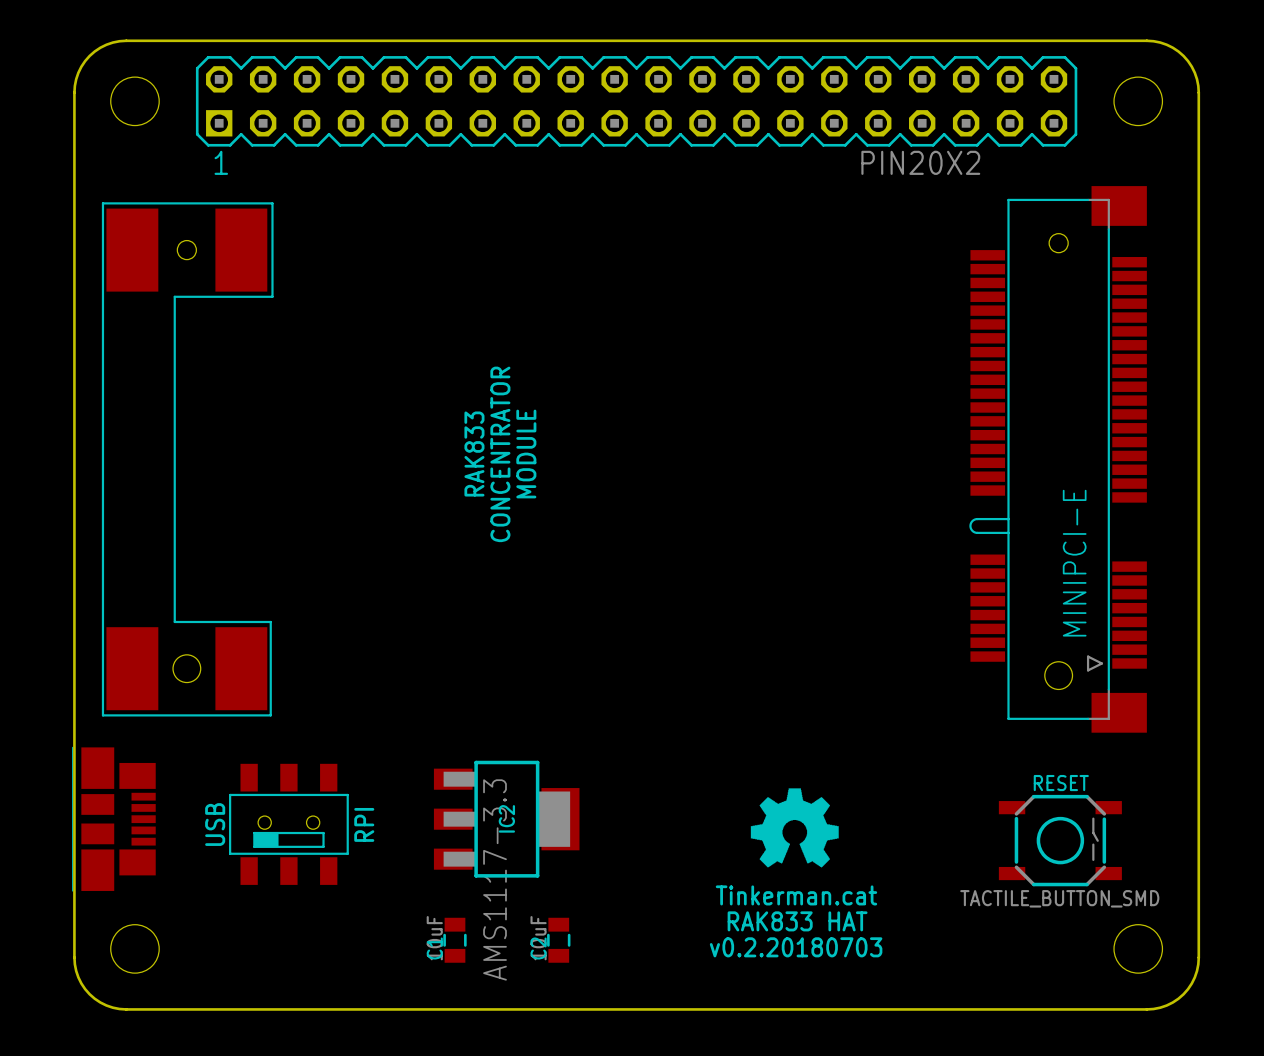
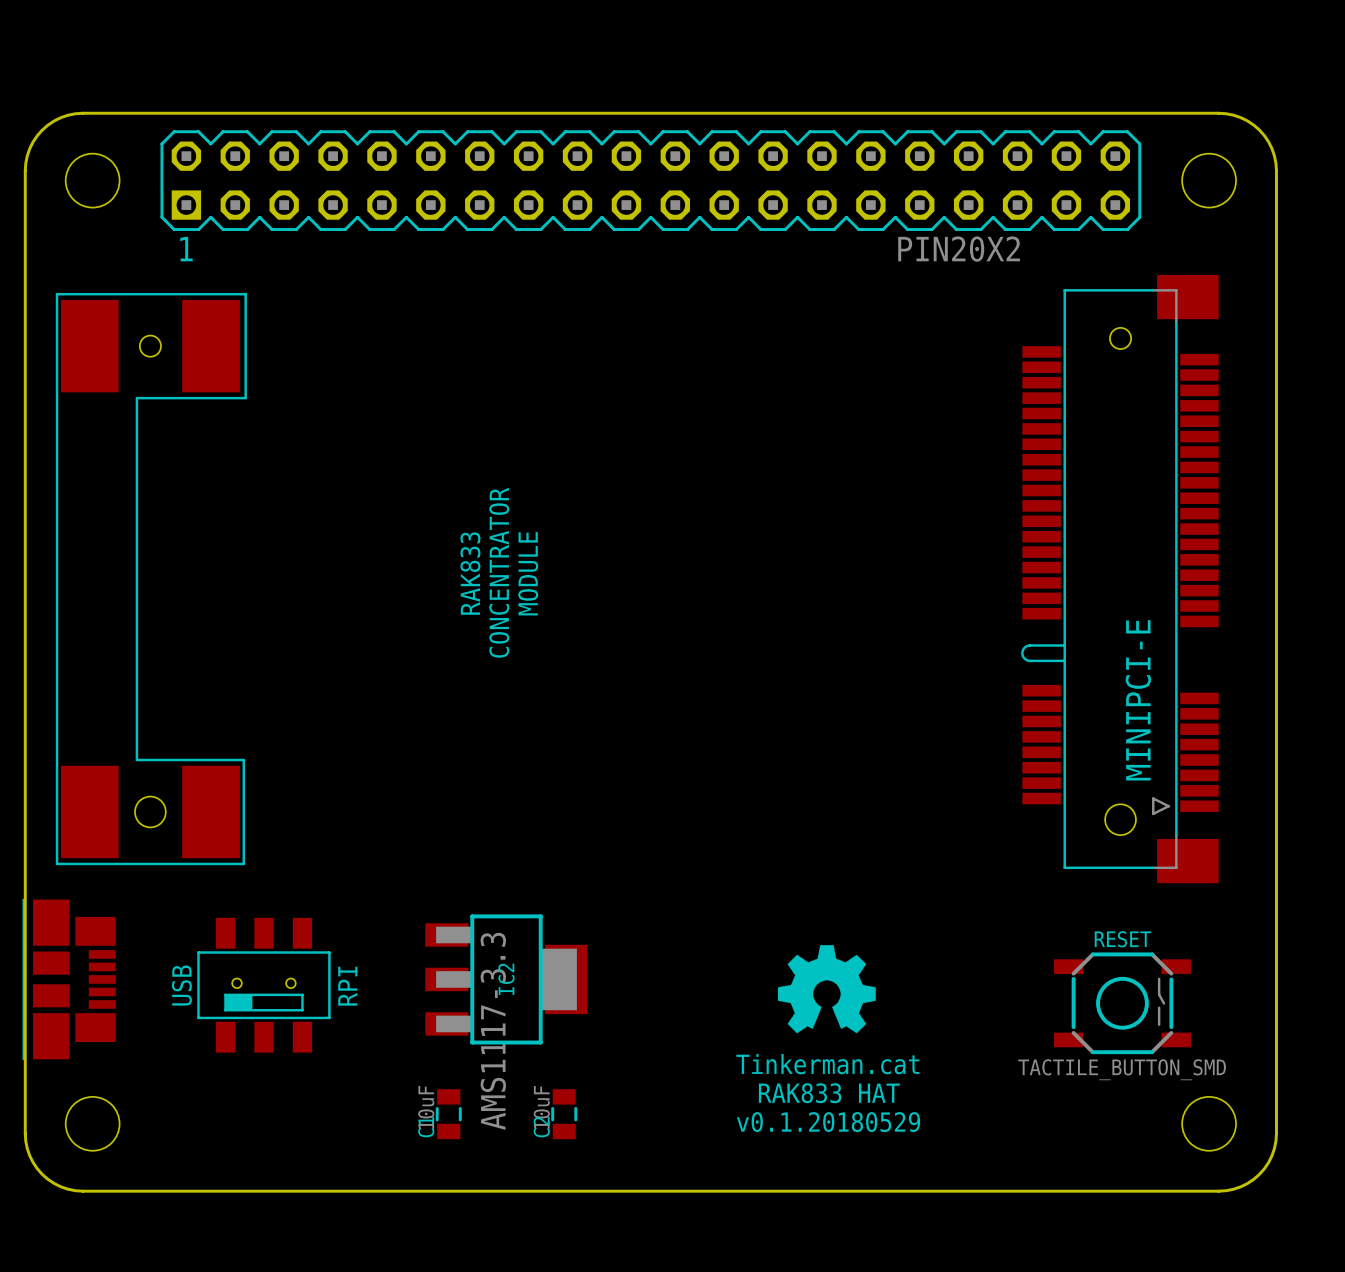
part footprint: [229, 763, 349, 885] -> [197, 917, 331, 1053]
text: v0.2.20180703 (796, 947) -> v0.1.20180529 (828, 1122)

